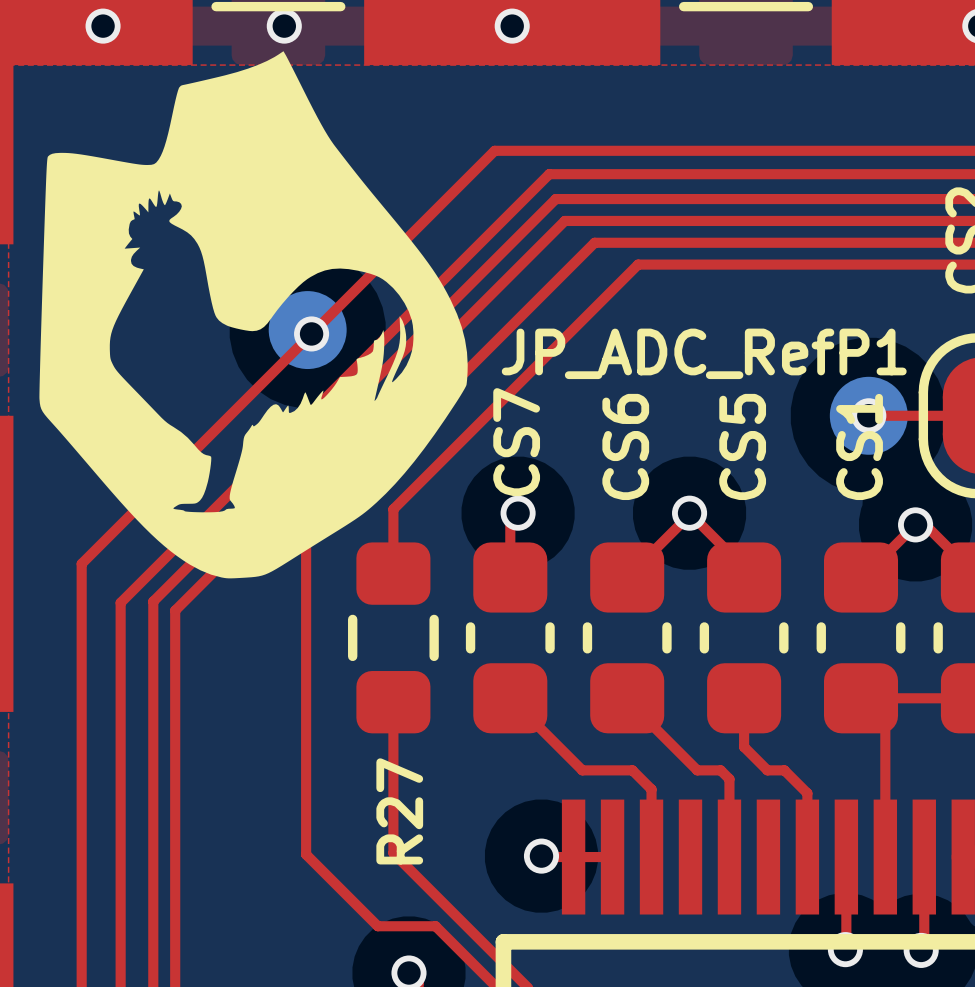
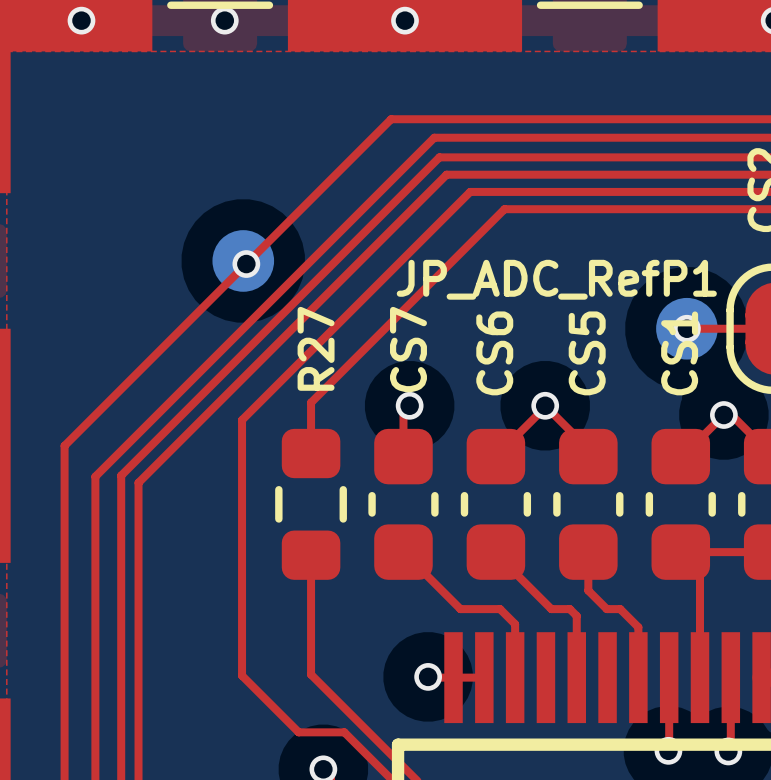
drawing: [39, 51, 468, 579] -> none
R27 name position: R27 (399, 811) -> R27 (316, 348)

